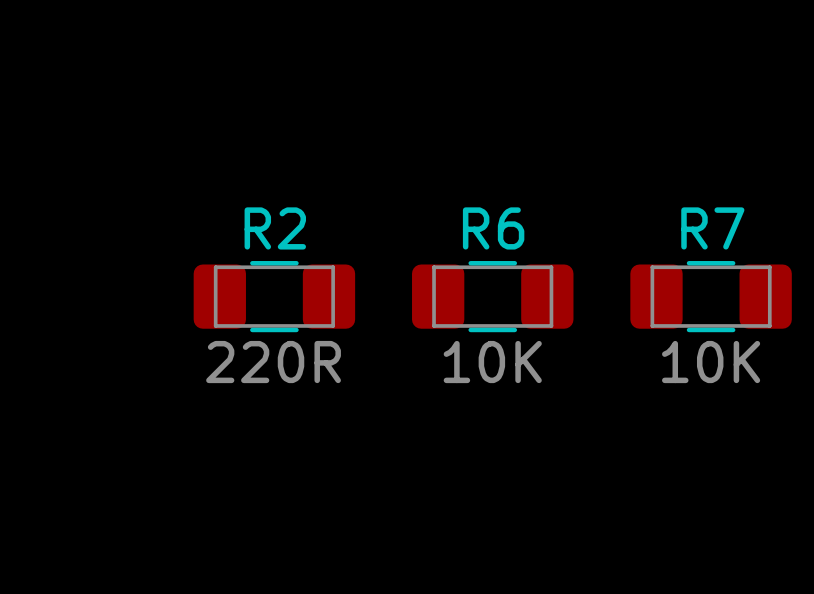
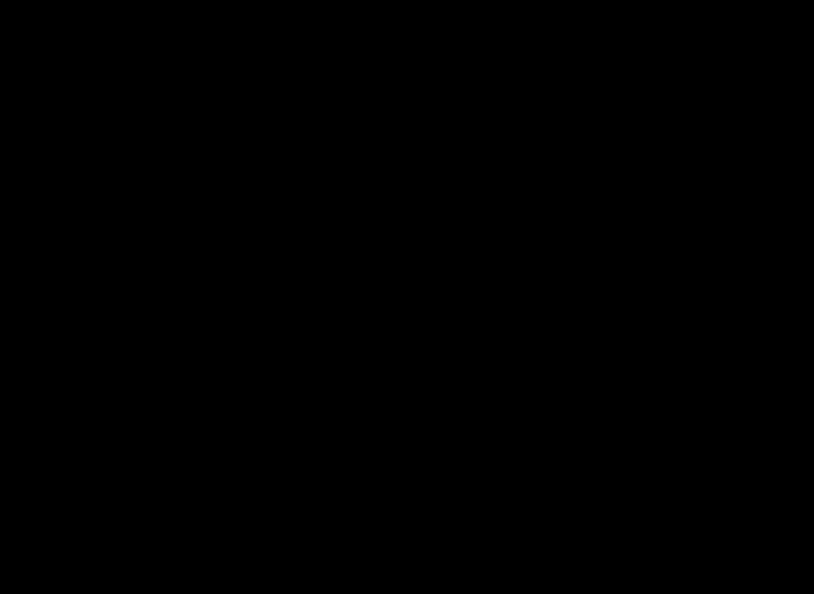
R2: 220R (274, 296) -> none
R6: 10K (492, 296) -> none
R7: 10K (711, 296) -> none

